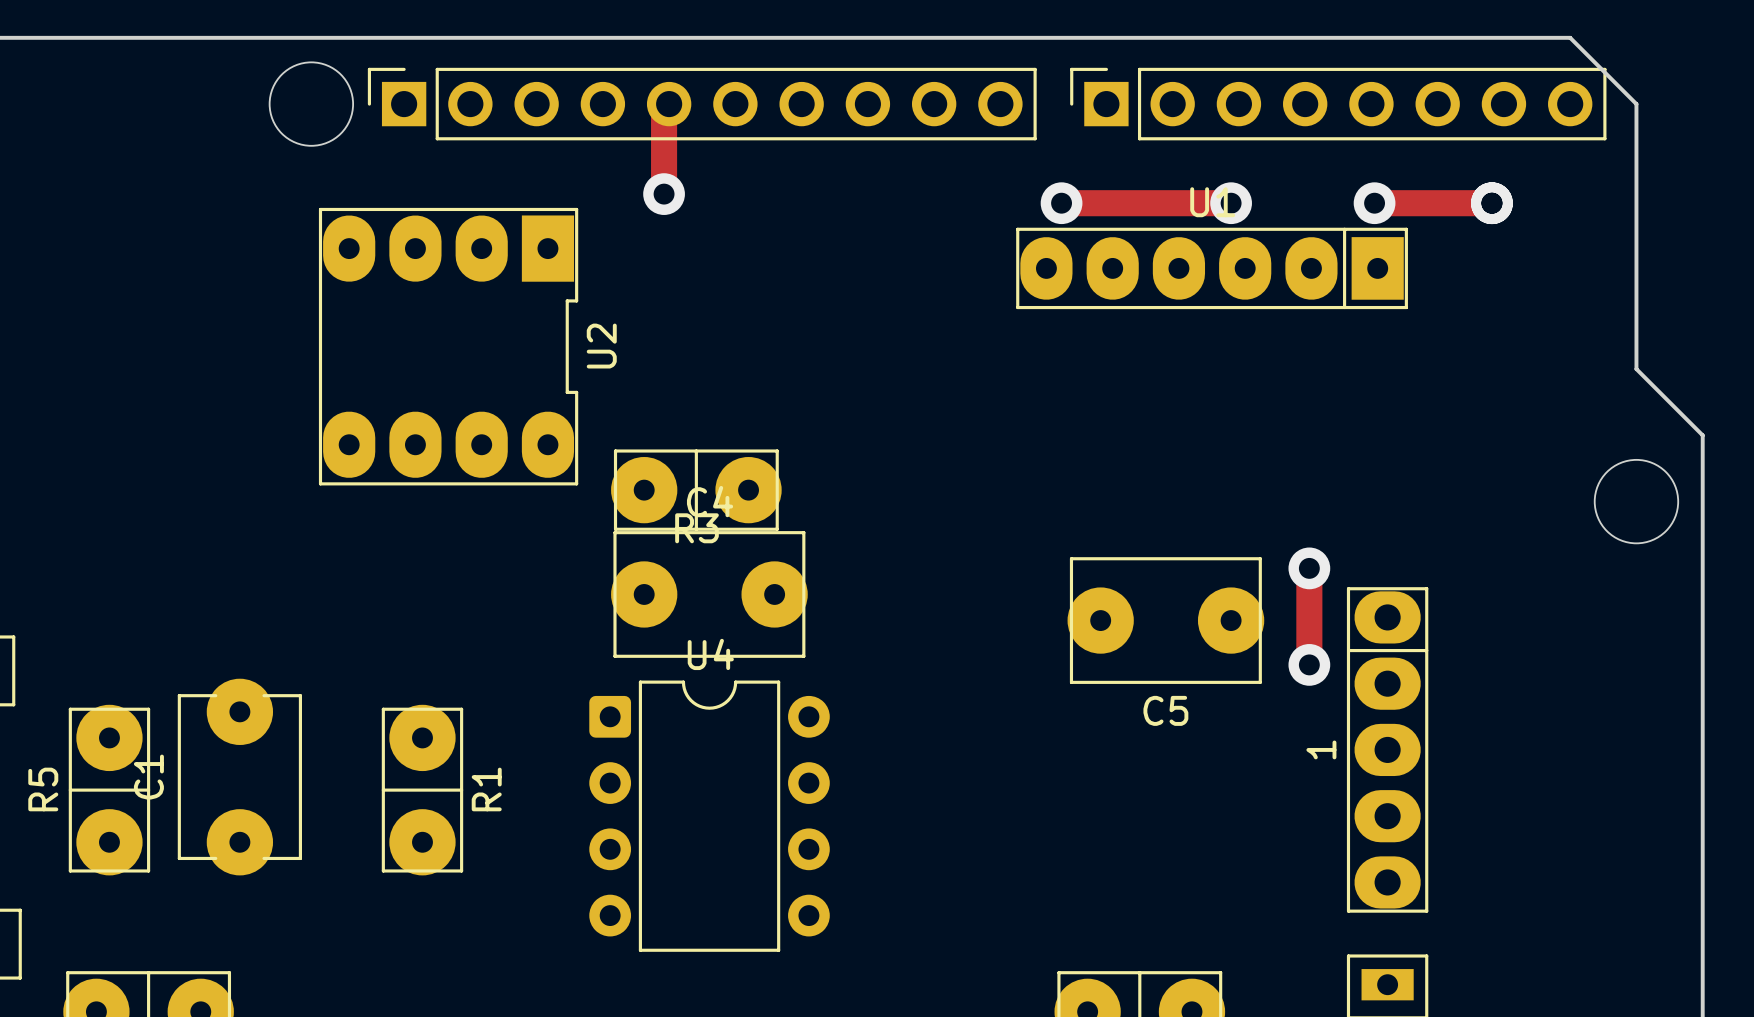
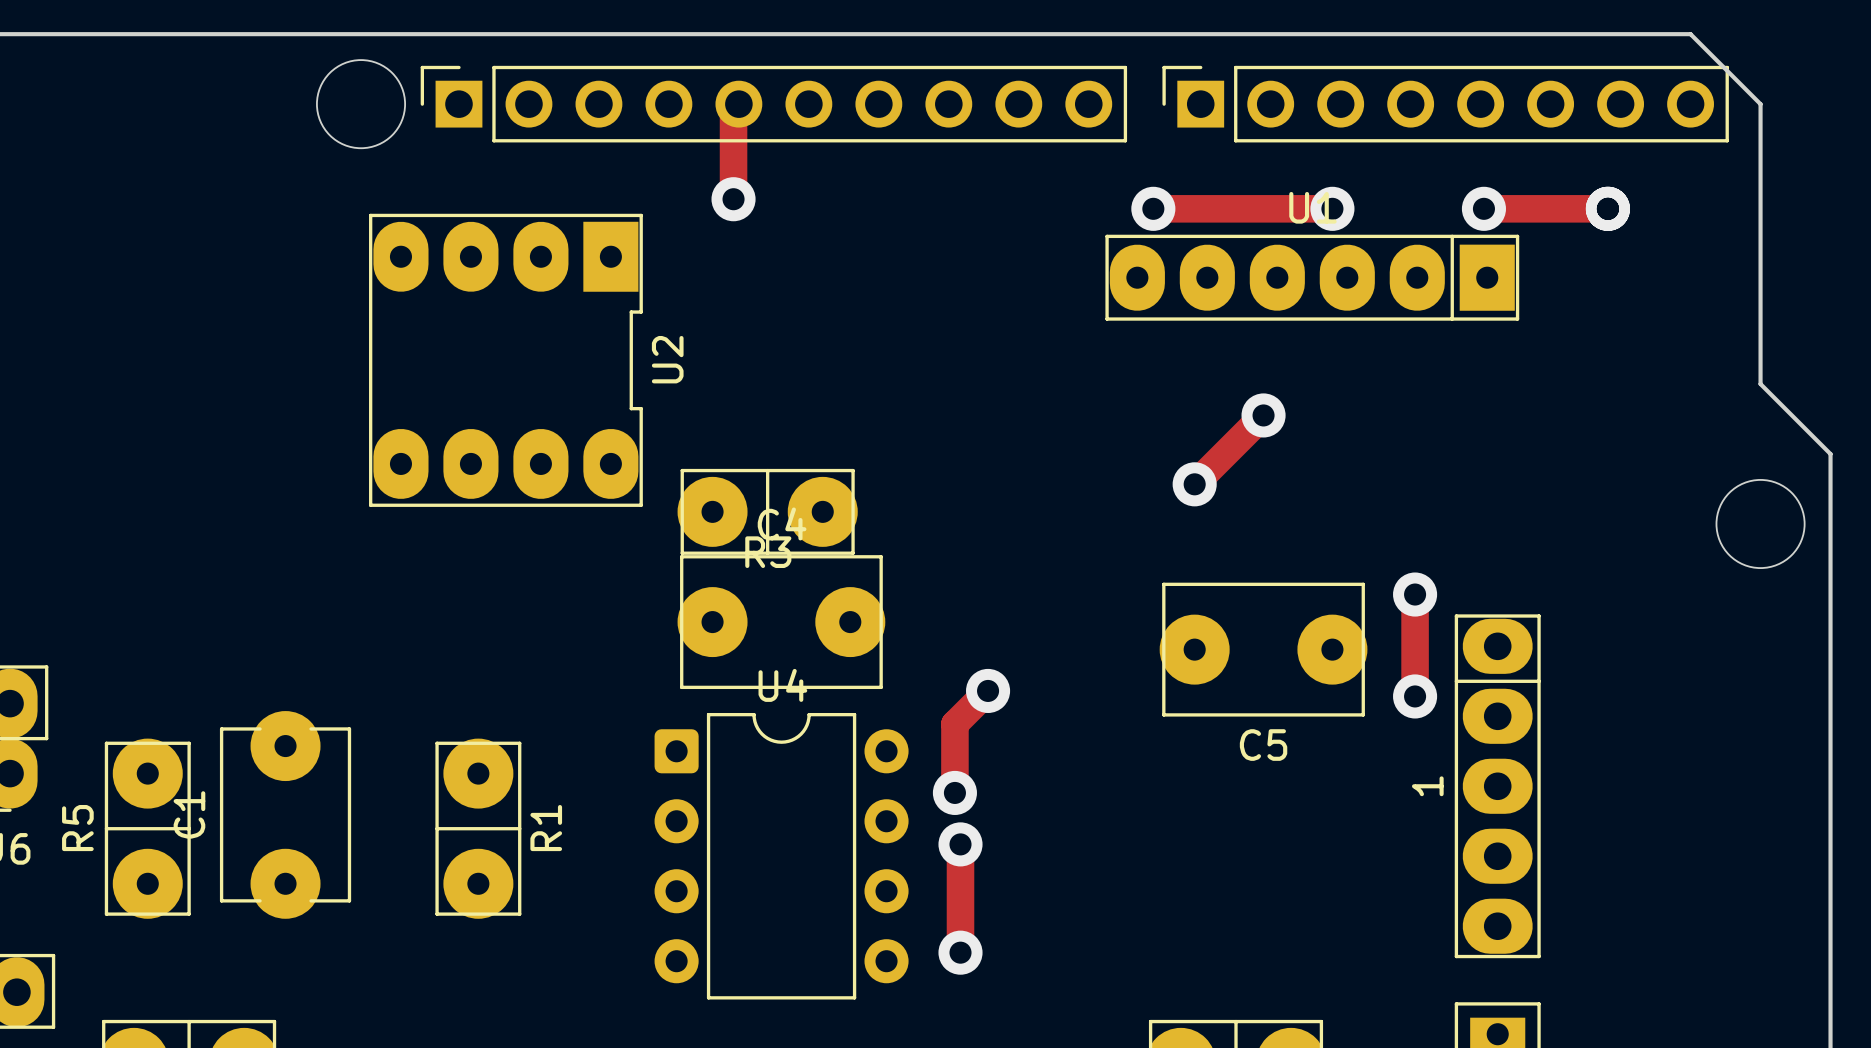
track: none -> (1263, 415) (1194, 484)
via: none -> (1263, 415)
via: none -> (1194, 484)
track: none -> (988, 690) (954, 724) (954, 792)
via: none -> (988, 690)
via: none -> (954, 792)
track: none -> (960, 844) (960, 952)
via: none -> (960, 844)
via: none -> (960, 952)

